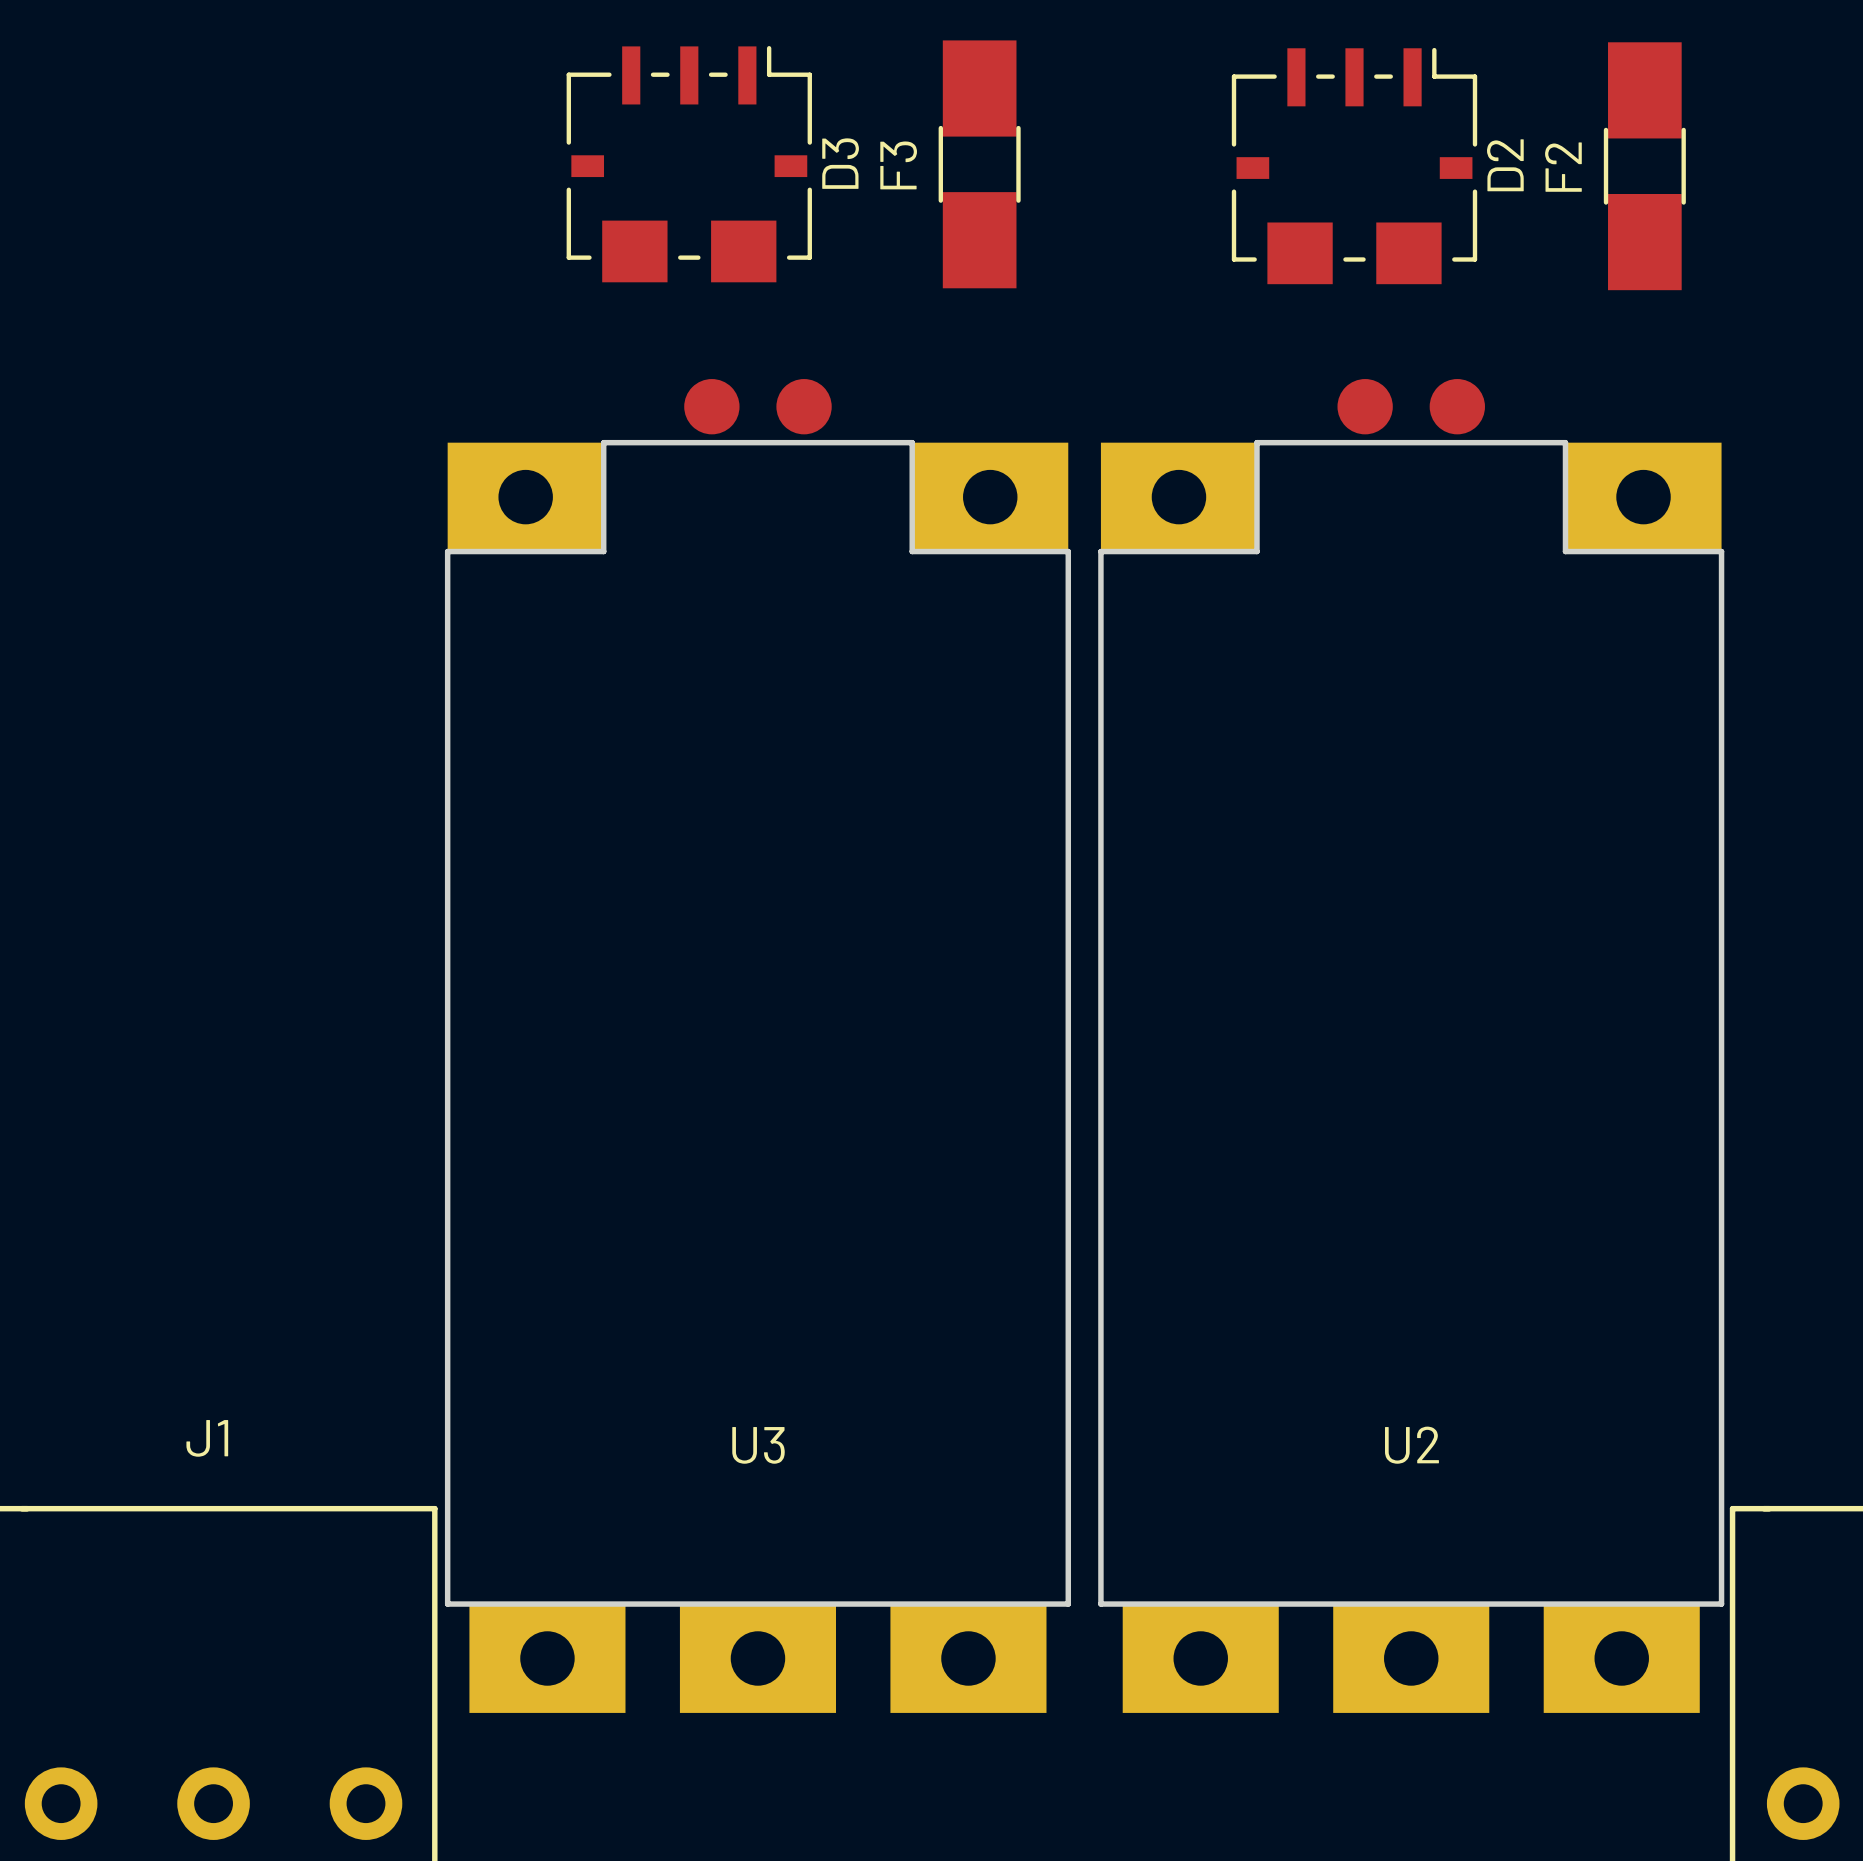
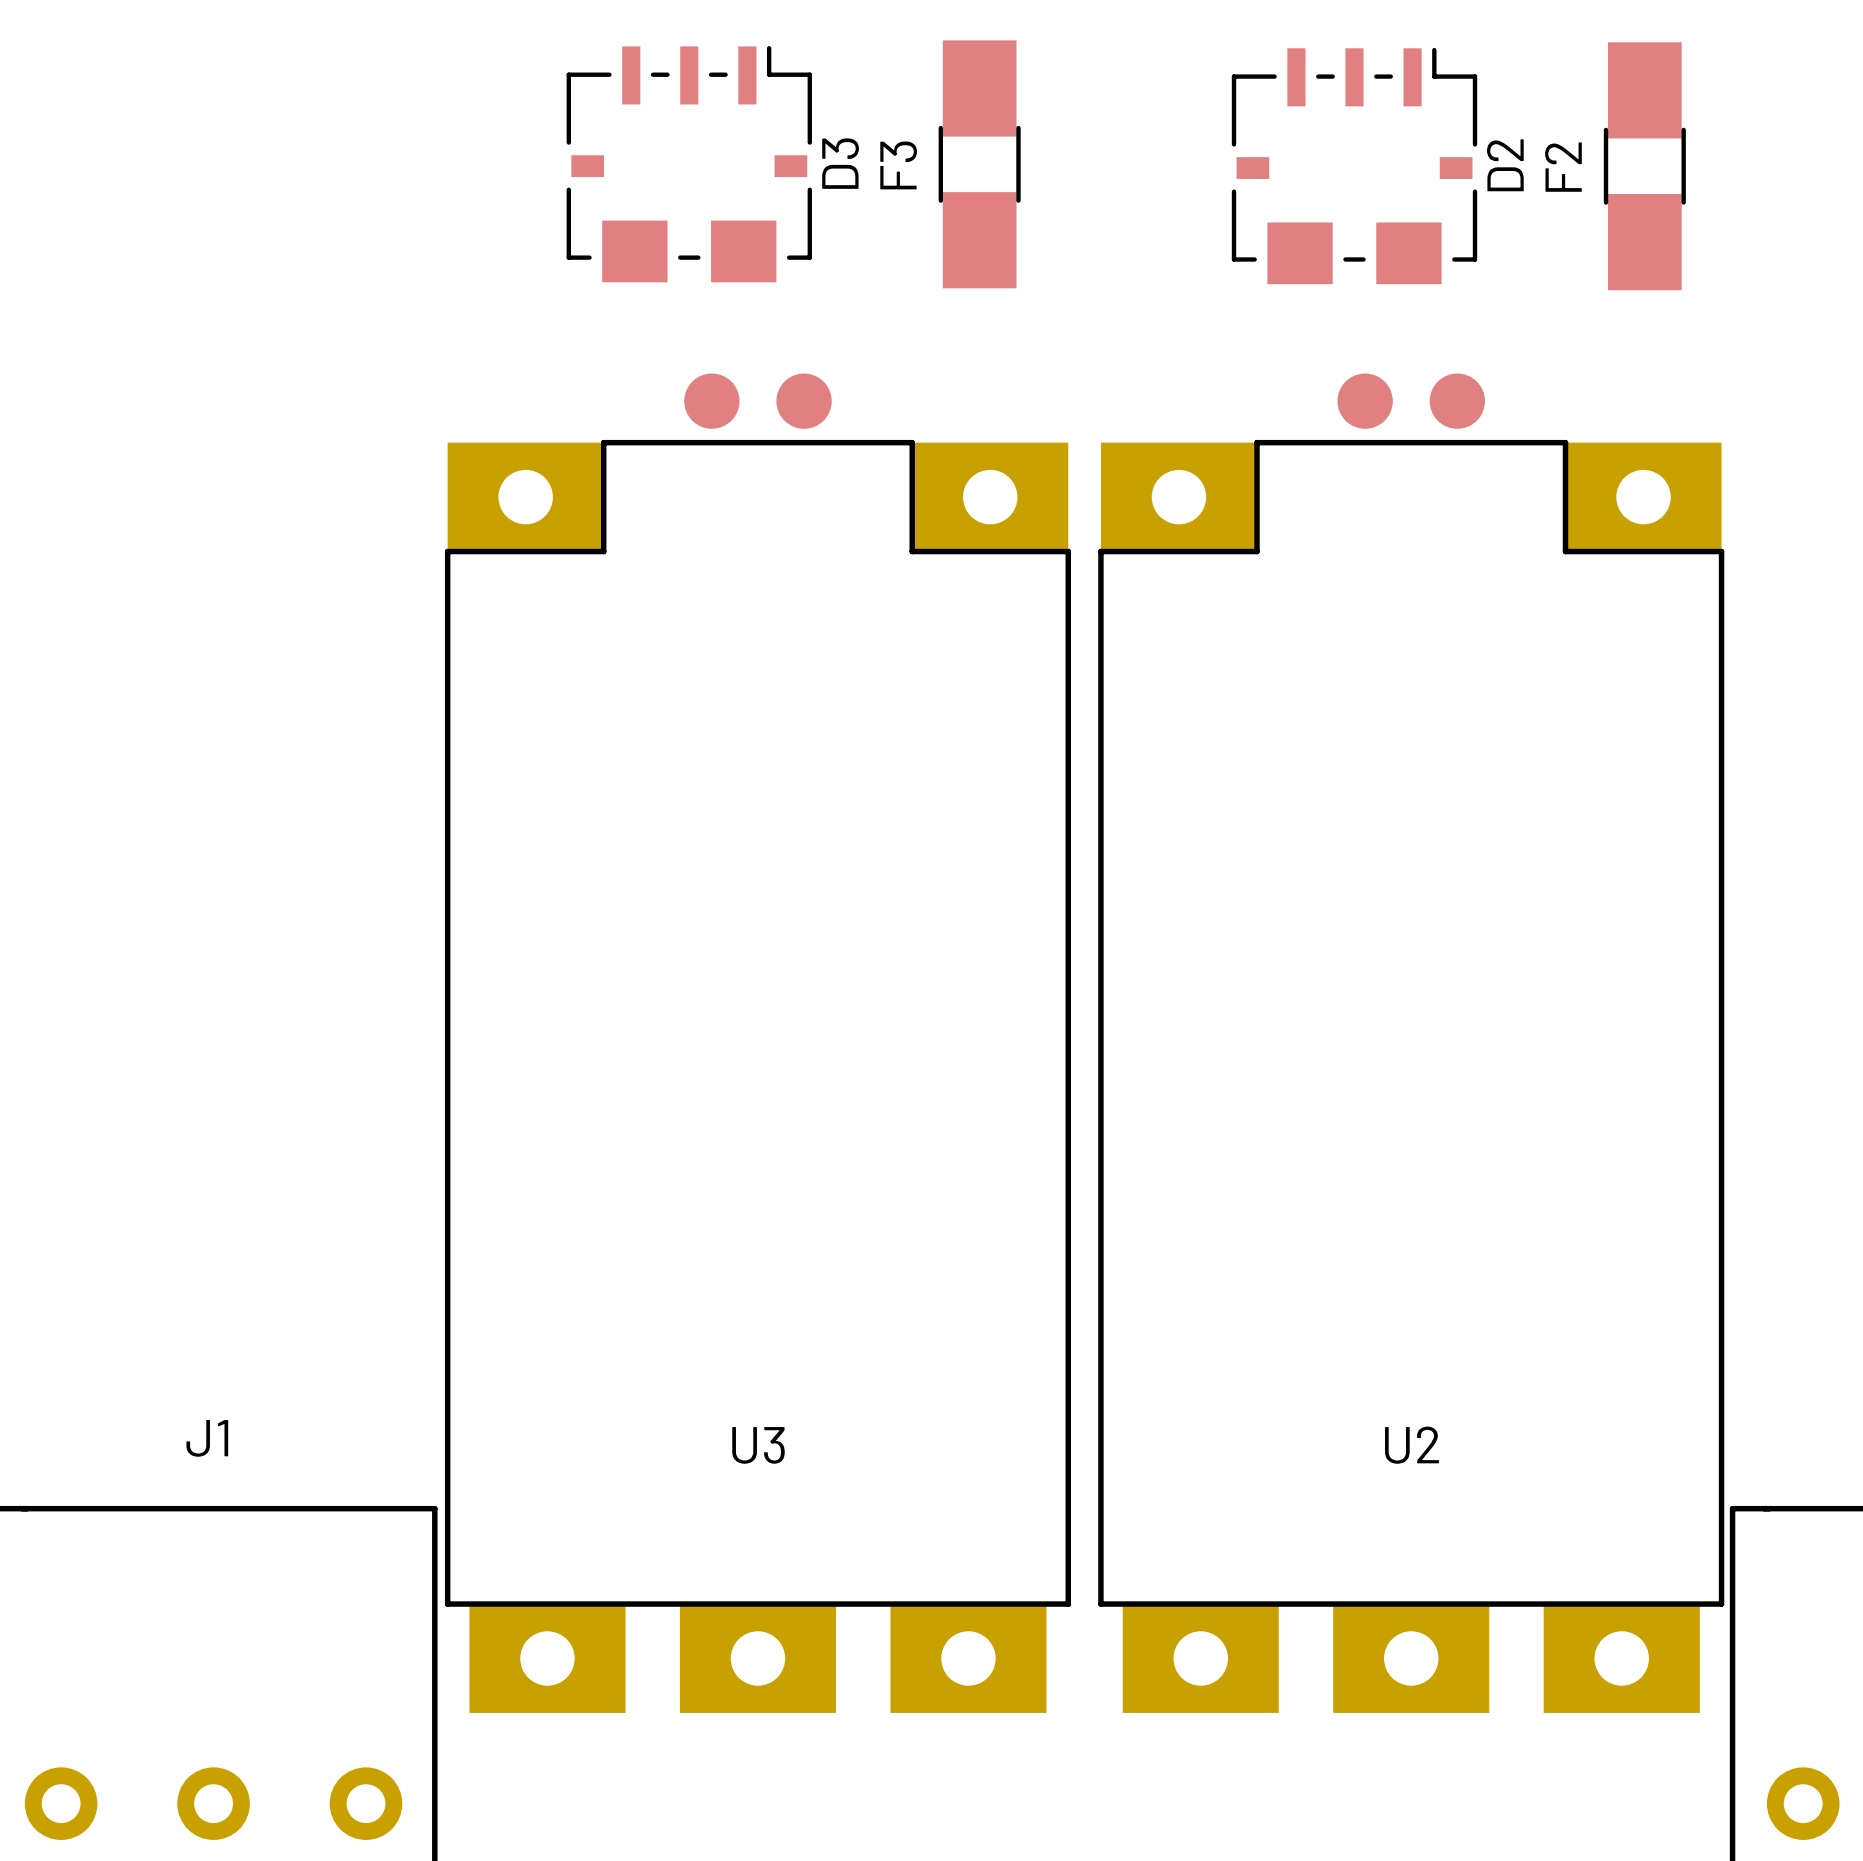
U3 footprint: [444, 379, 1071, 1713] -> [444, 373, 1071, 1713]
U2 footprint: [1098, 379, 1725, 1713] -> [1098, 373, 1725, 1713]

